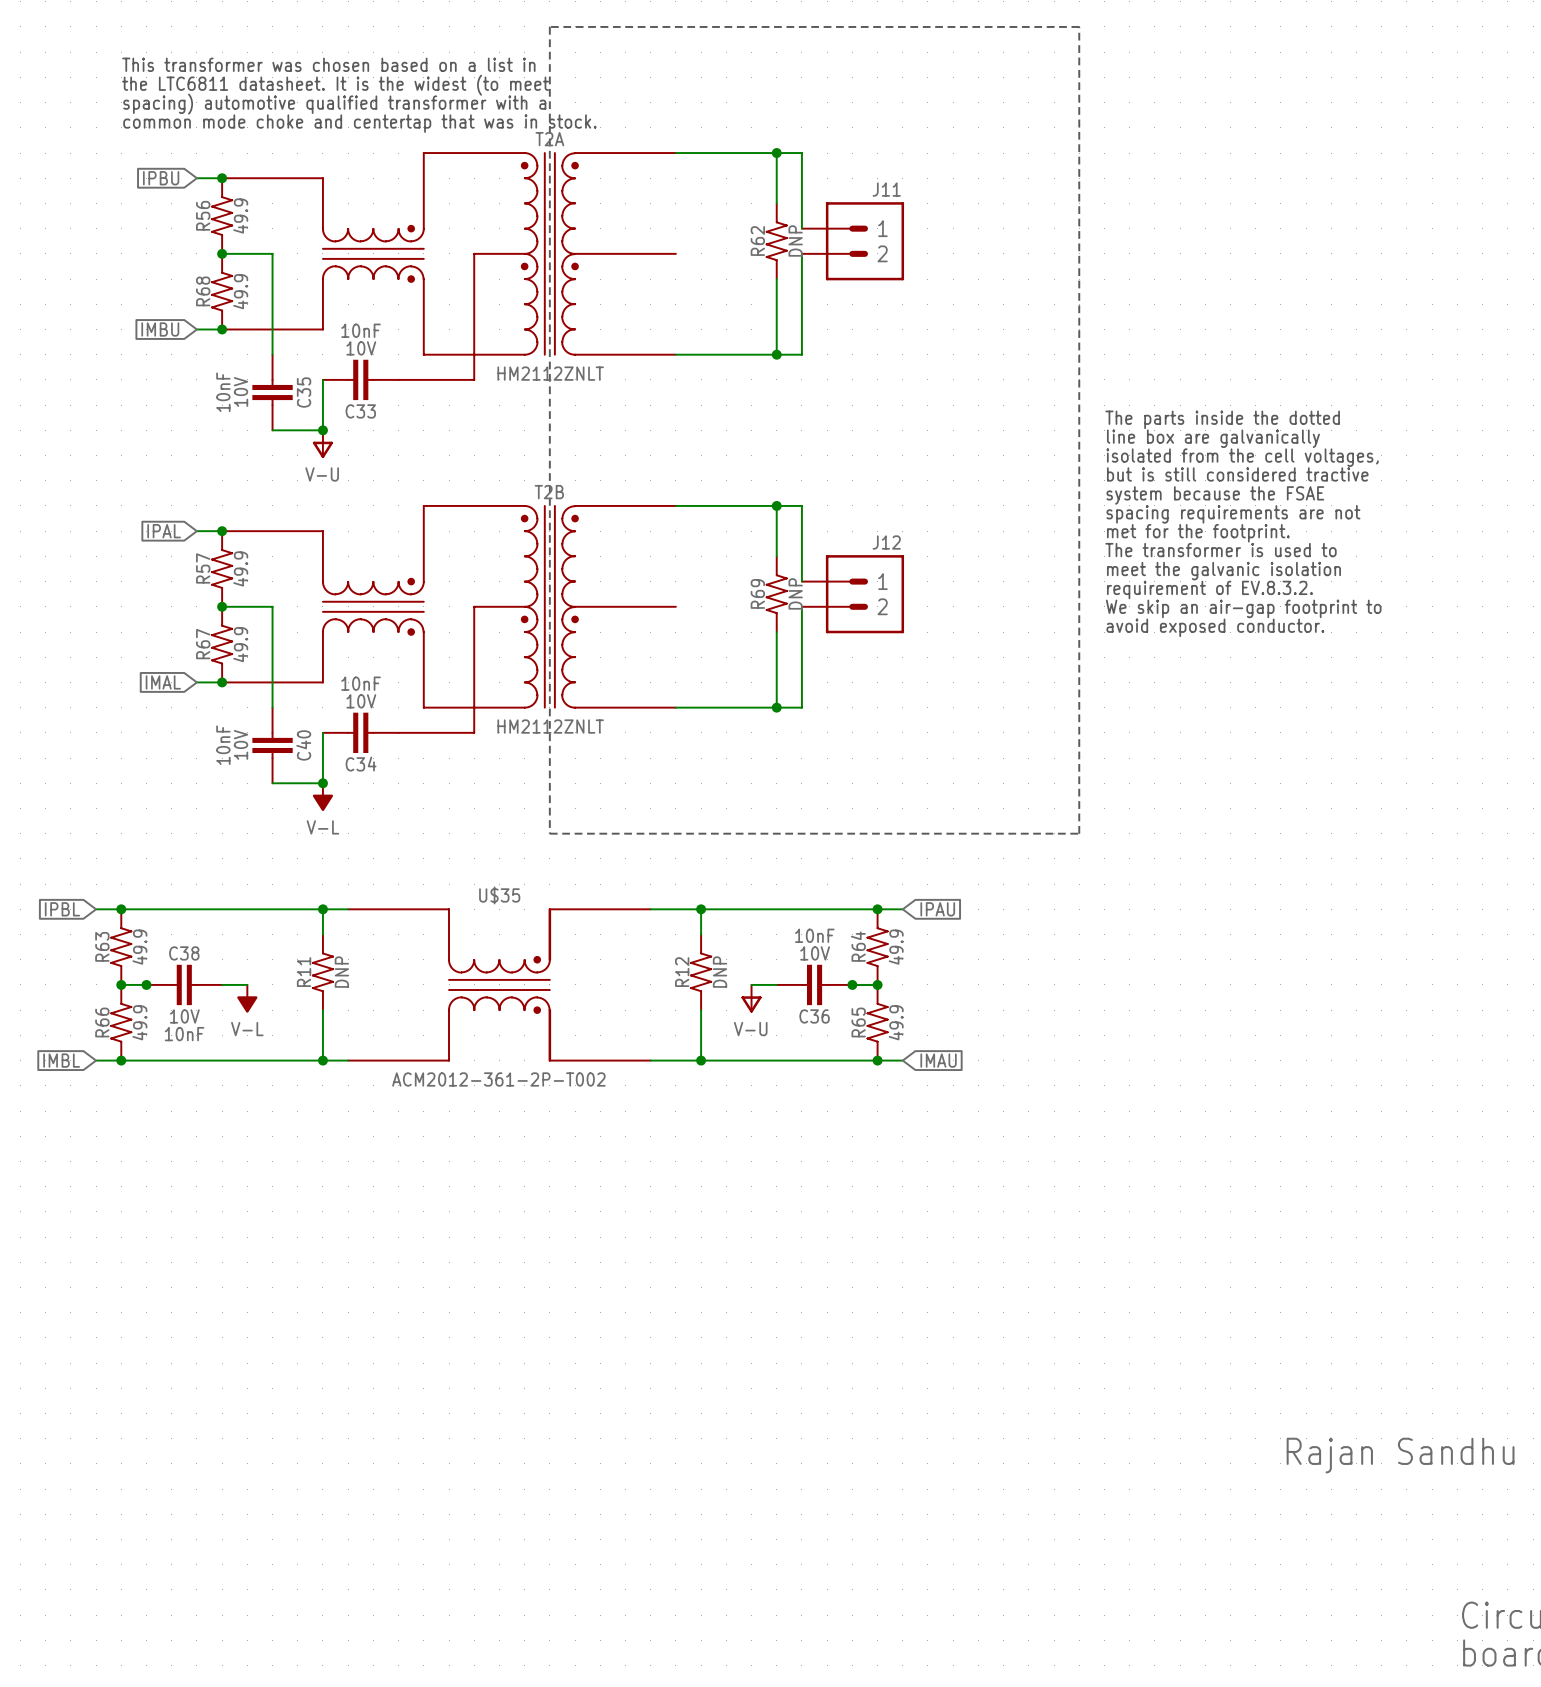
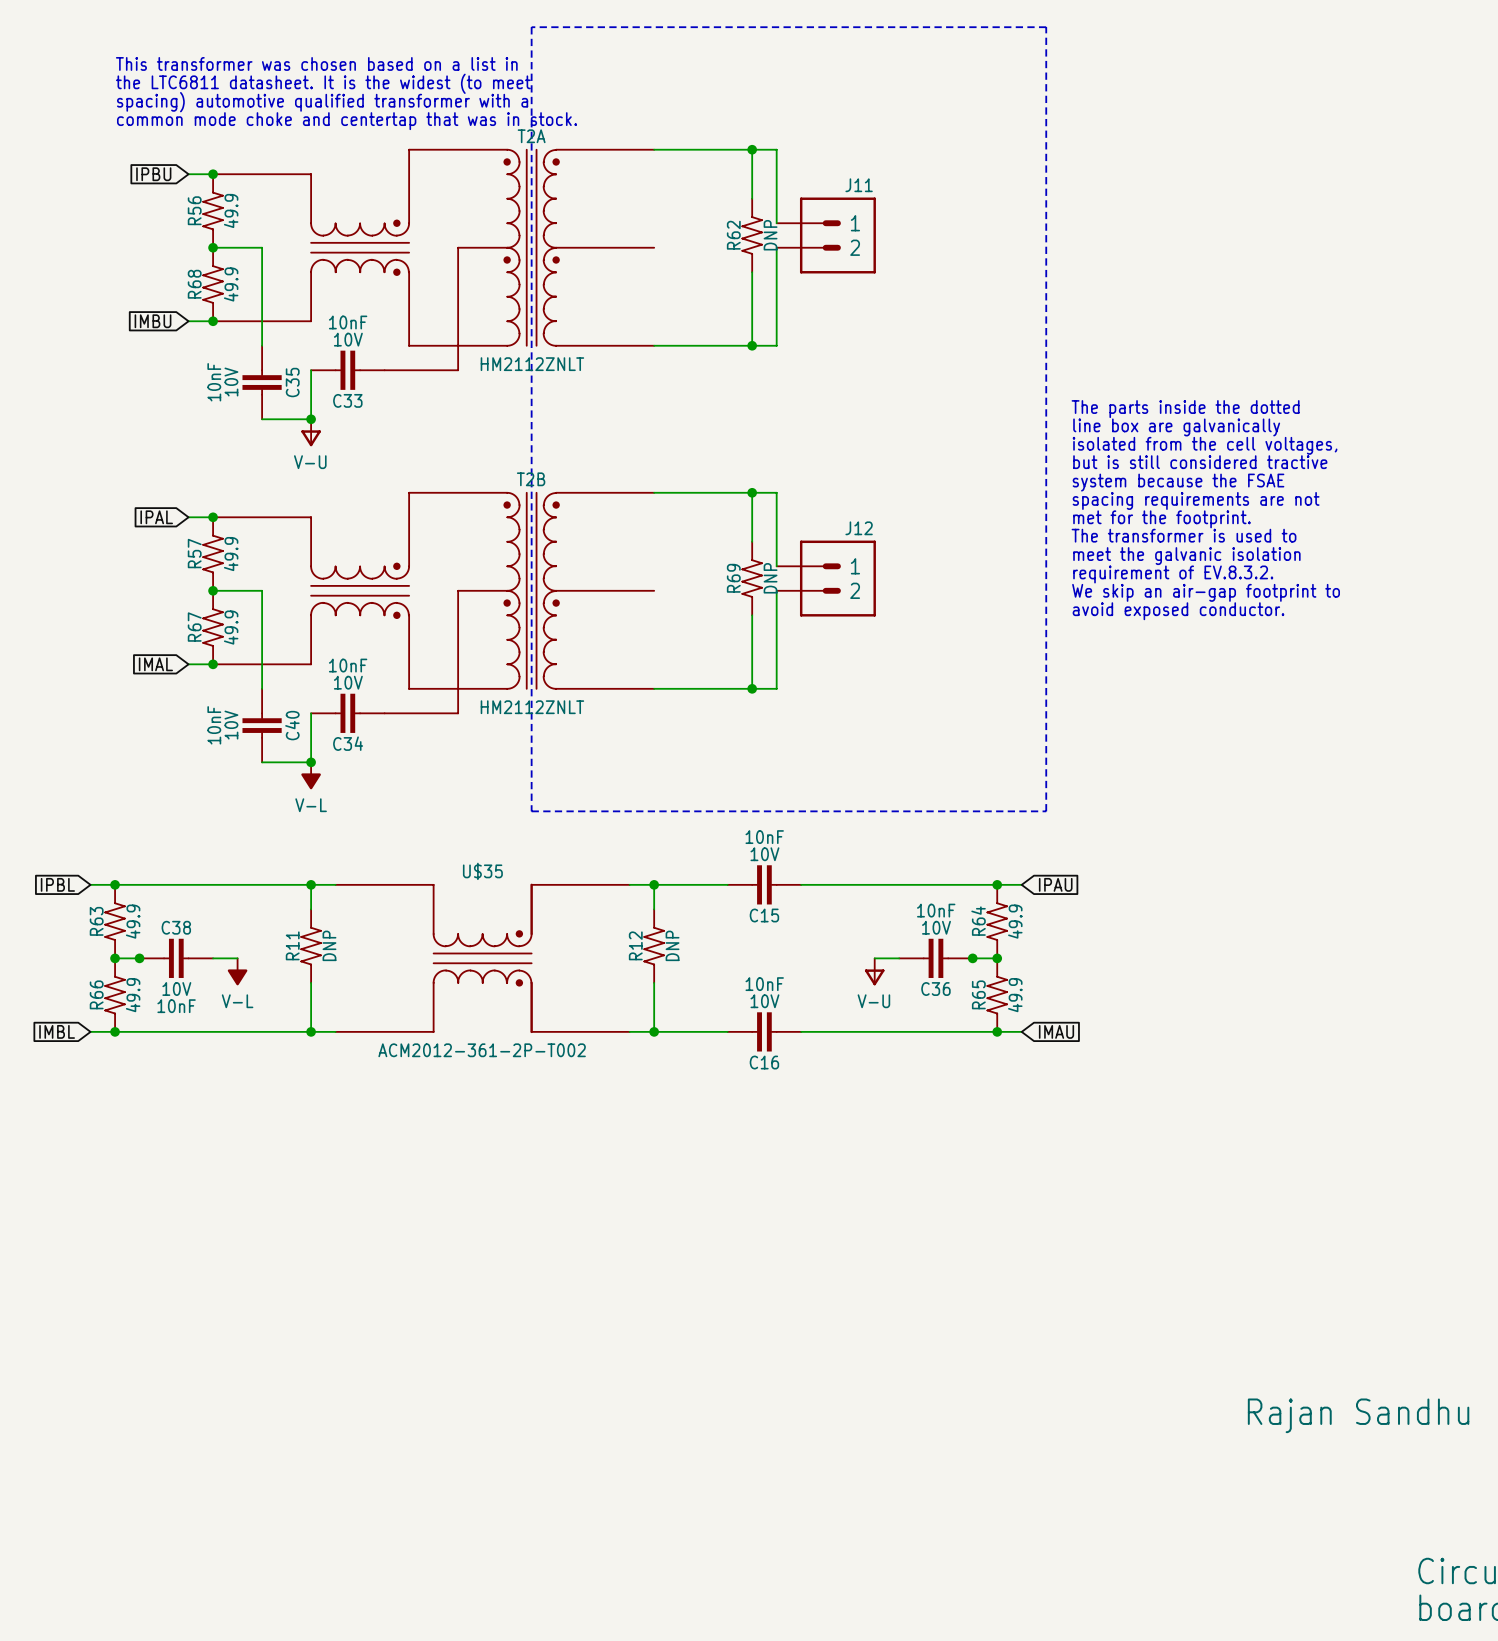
wire: (701, 909) (701, 934) -> (654, 884) (654, 909)
junction position: (701, 909) -> (654, 884)
C15: none -> (764, 884)
junction: (877, 909) -> none
wire: none -> (874, 884) (1021, 884)
global label position: IPAU (937, 909) -> IPAU (1055, 884)
junction: none -> (997, 884)
R64 position: (877, 947) -> (997, 921)
R12 position: (701, 972) -> (654, 946)
wire: (751, 984) (776, 984) -> (874, 958) (899, 958)
C36 position: (814, 984) -> (935, 958)
wire: (852, 984) (877, 984) -> (972, 958) (997, 958)
junction: (852, 984) -> none
junction: (877, 984) -> none
junction: none -> (972, 958)
junction: none -> (997, 958)
power symbol position: V-U (751, 998) -> V-U (874, 971)
wire: (701, 1010) (701, 1060) -> (654, 982) (654, 1031)
R65 position: (877, 1022) -> (997, 995)
junction position: (701, 1060) -> (654, 1031)
C16: none -> (764, 1031)
junction: (877, 1060) -> none
wire: none -> (874, 1031) (1021, 1031)
global label position: IMAU (938, 1060) -> IMAU (1056, 1031)
junction: none -> (997, 1031)

